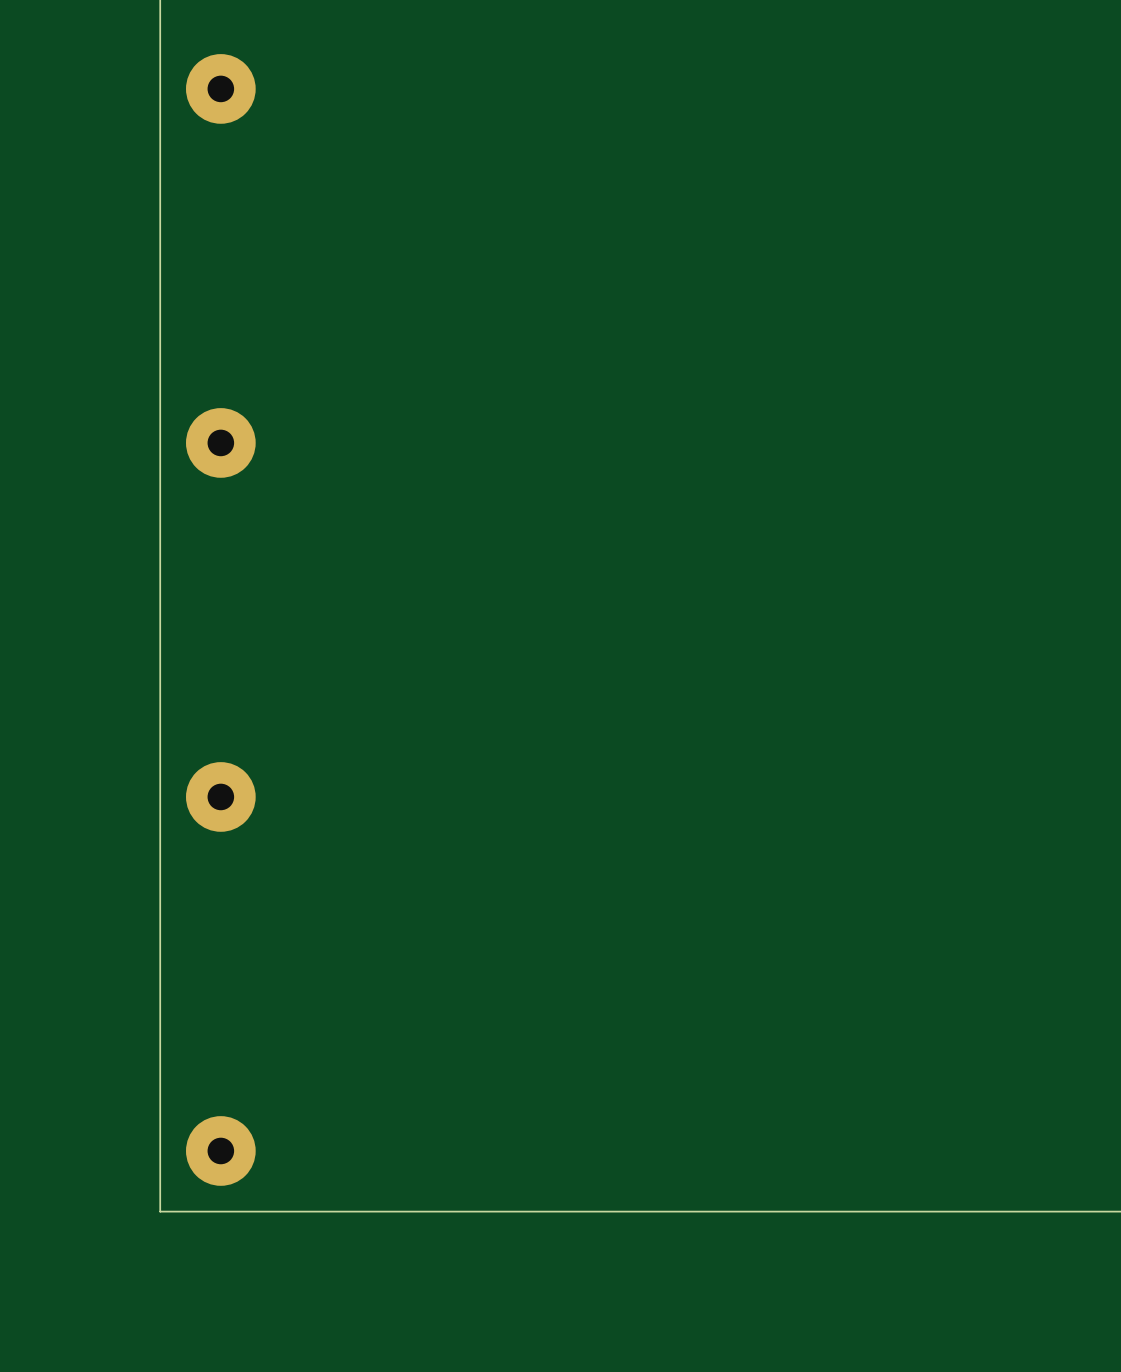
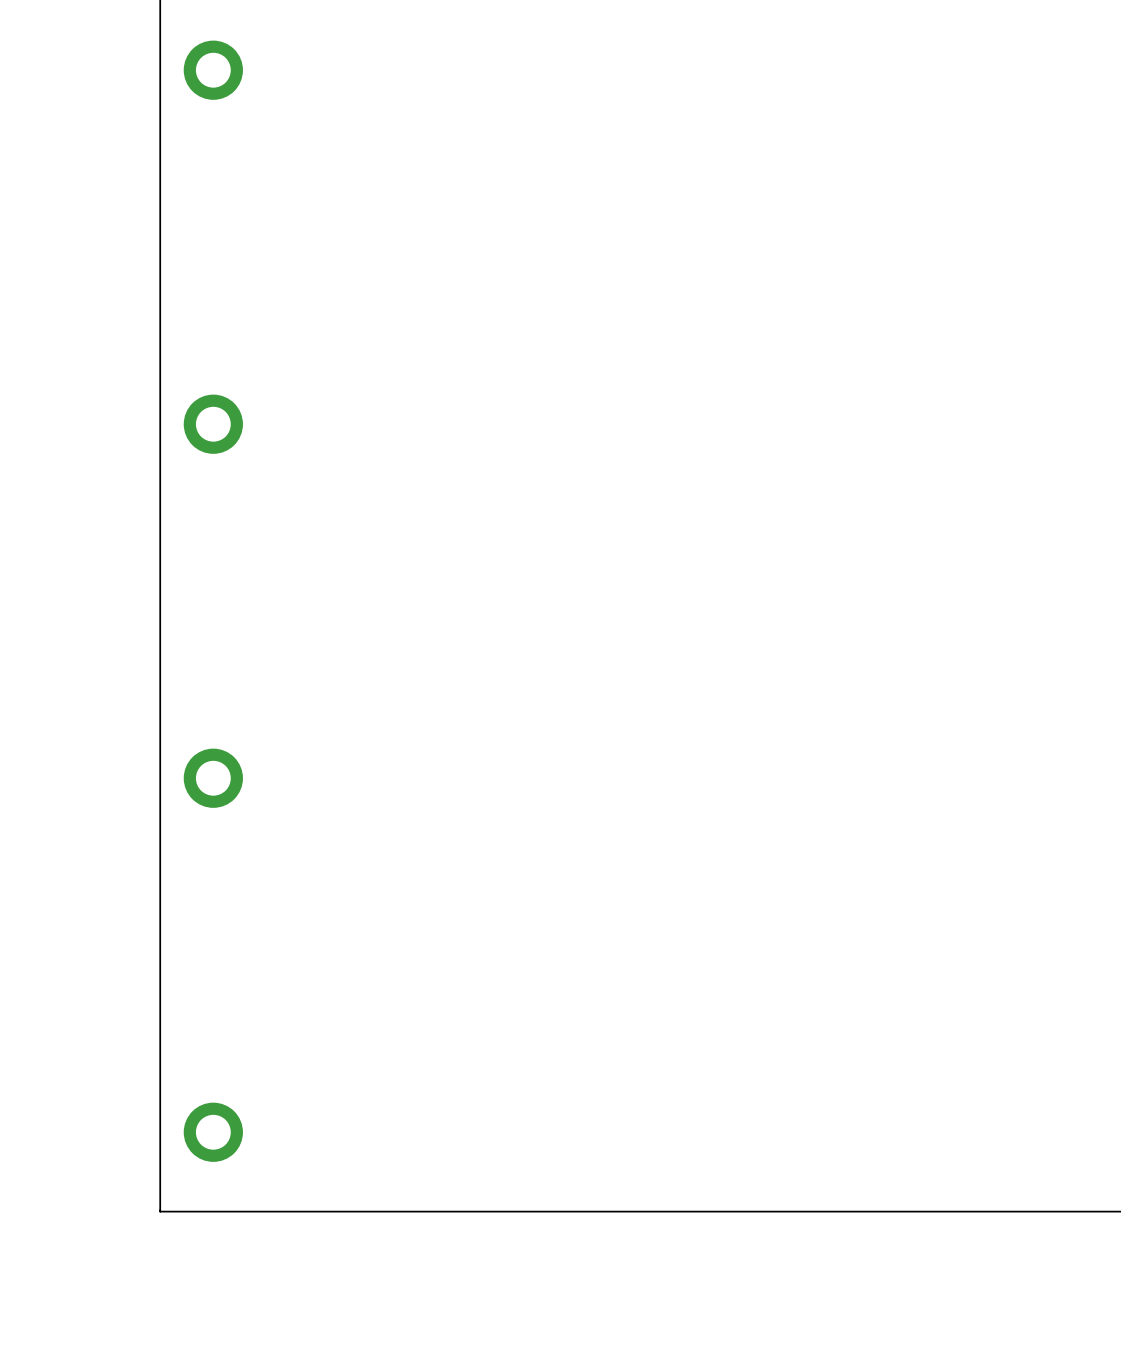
part footprint: [185, 54, 256, 124] -> [183, 40, 243, 100]
part footprint: [185, 408, 256, 478] -> [183, 394, 243, 454]
part footprint: [185, 762, 256, 832] -> [183, 748, 243, 808]
part footprint: [185, 1116, 256, 1186] -> [183, 1102, 243, 1162]

